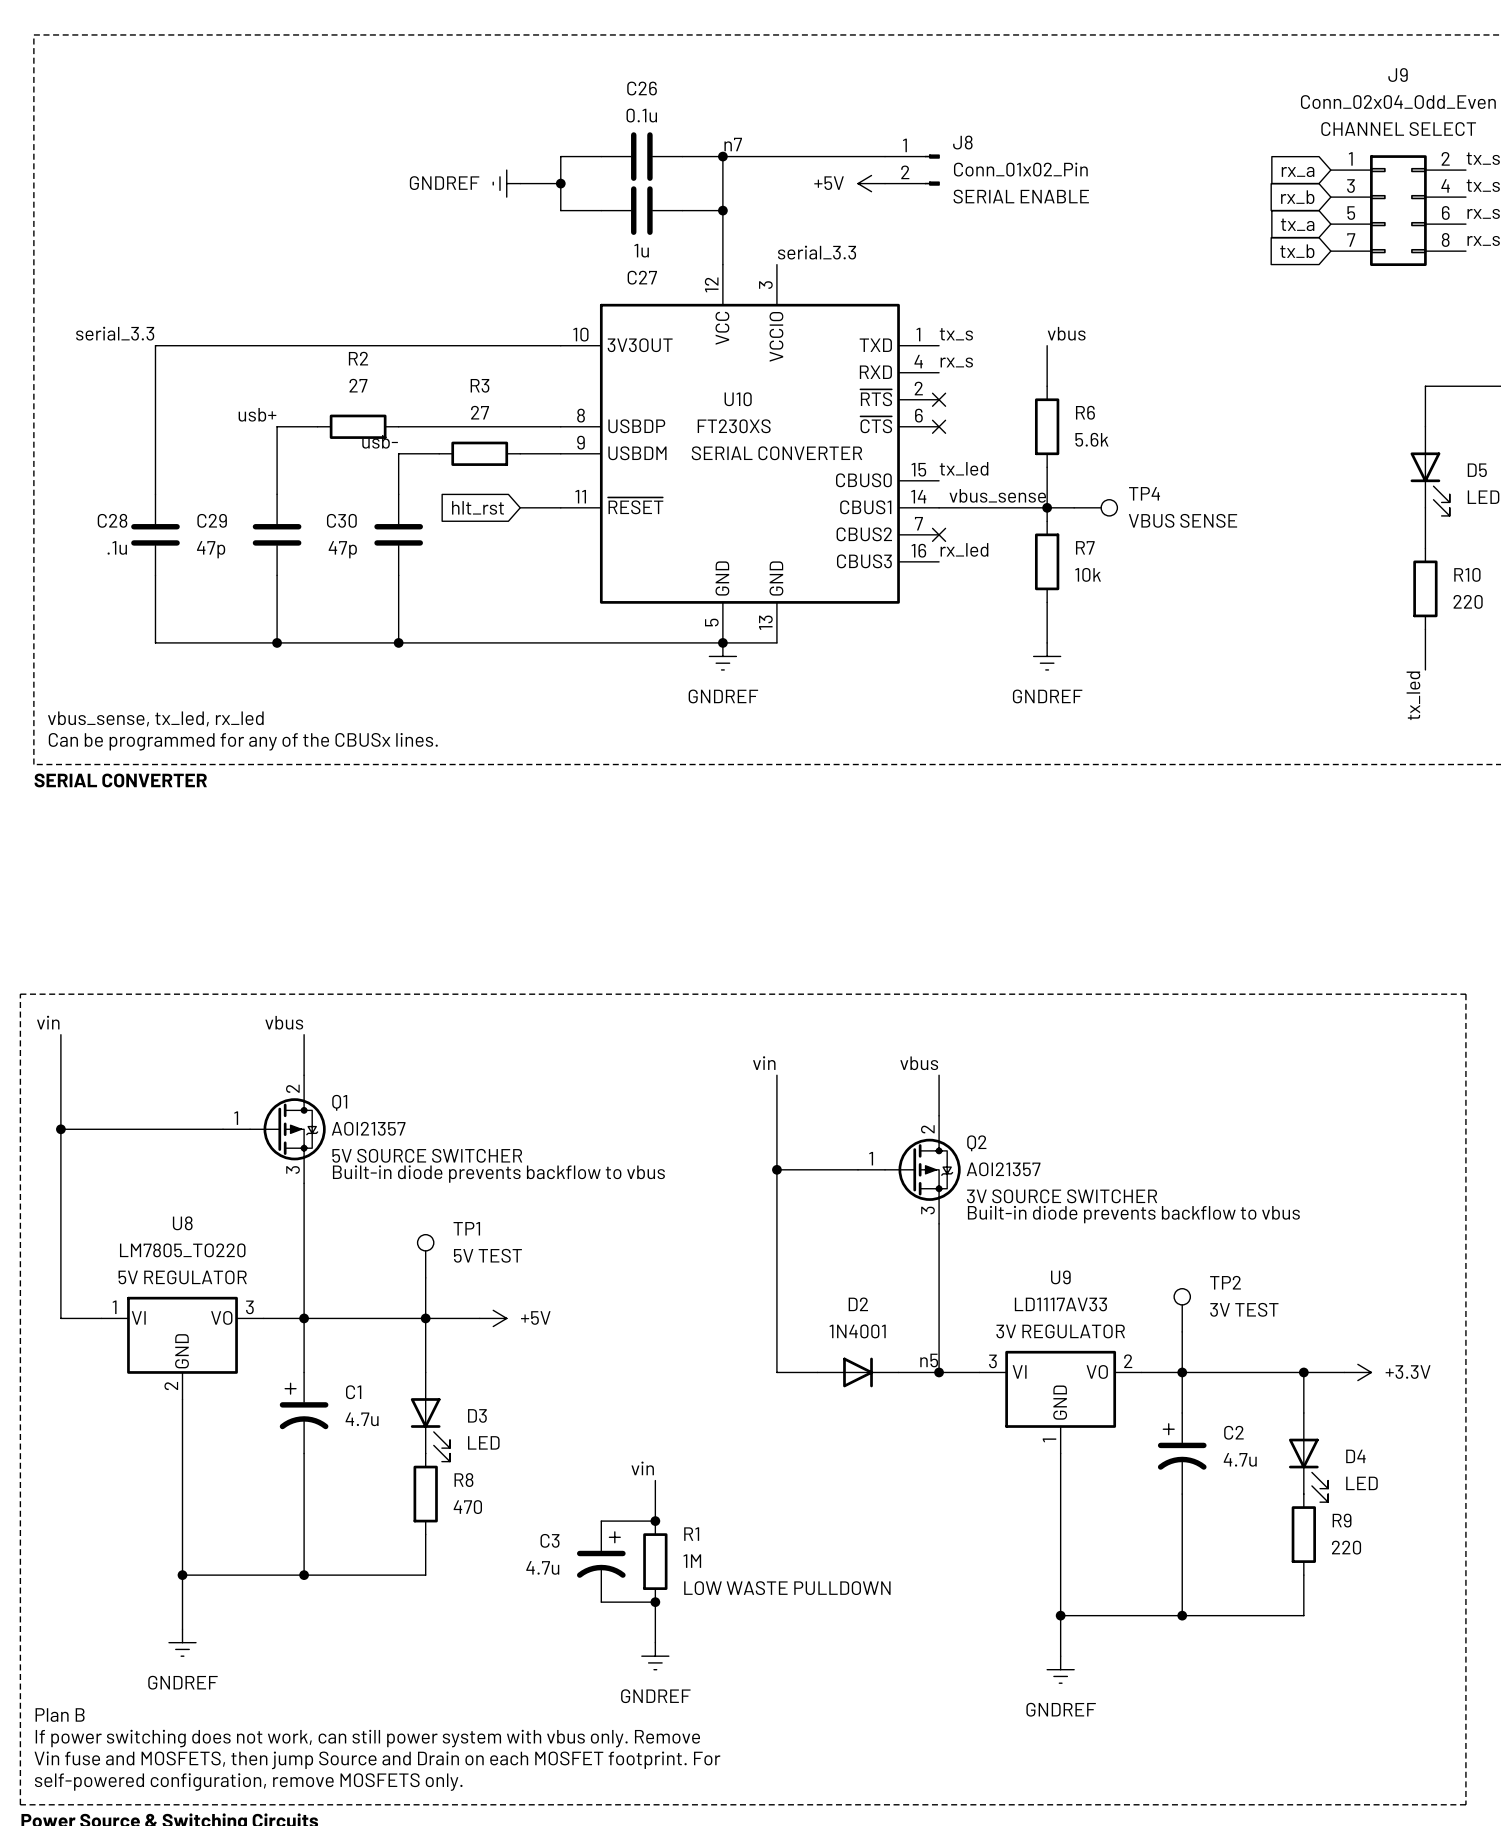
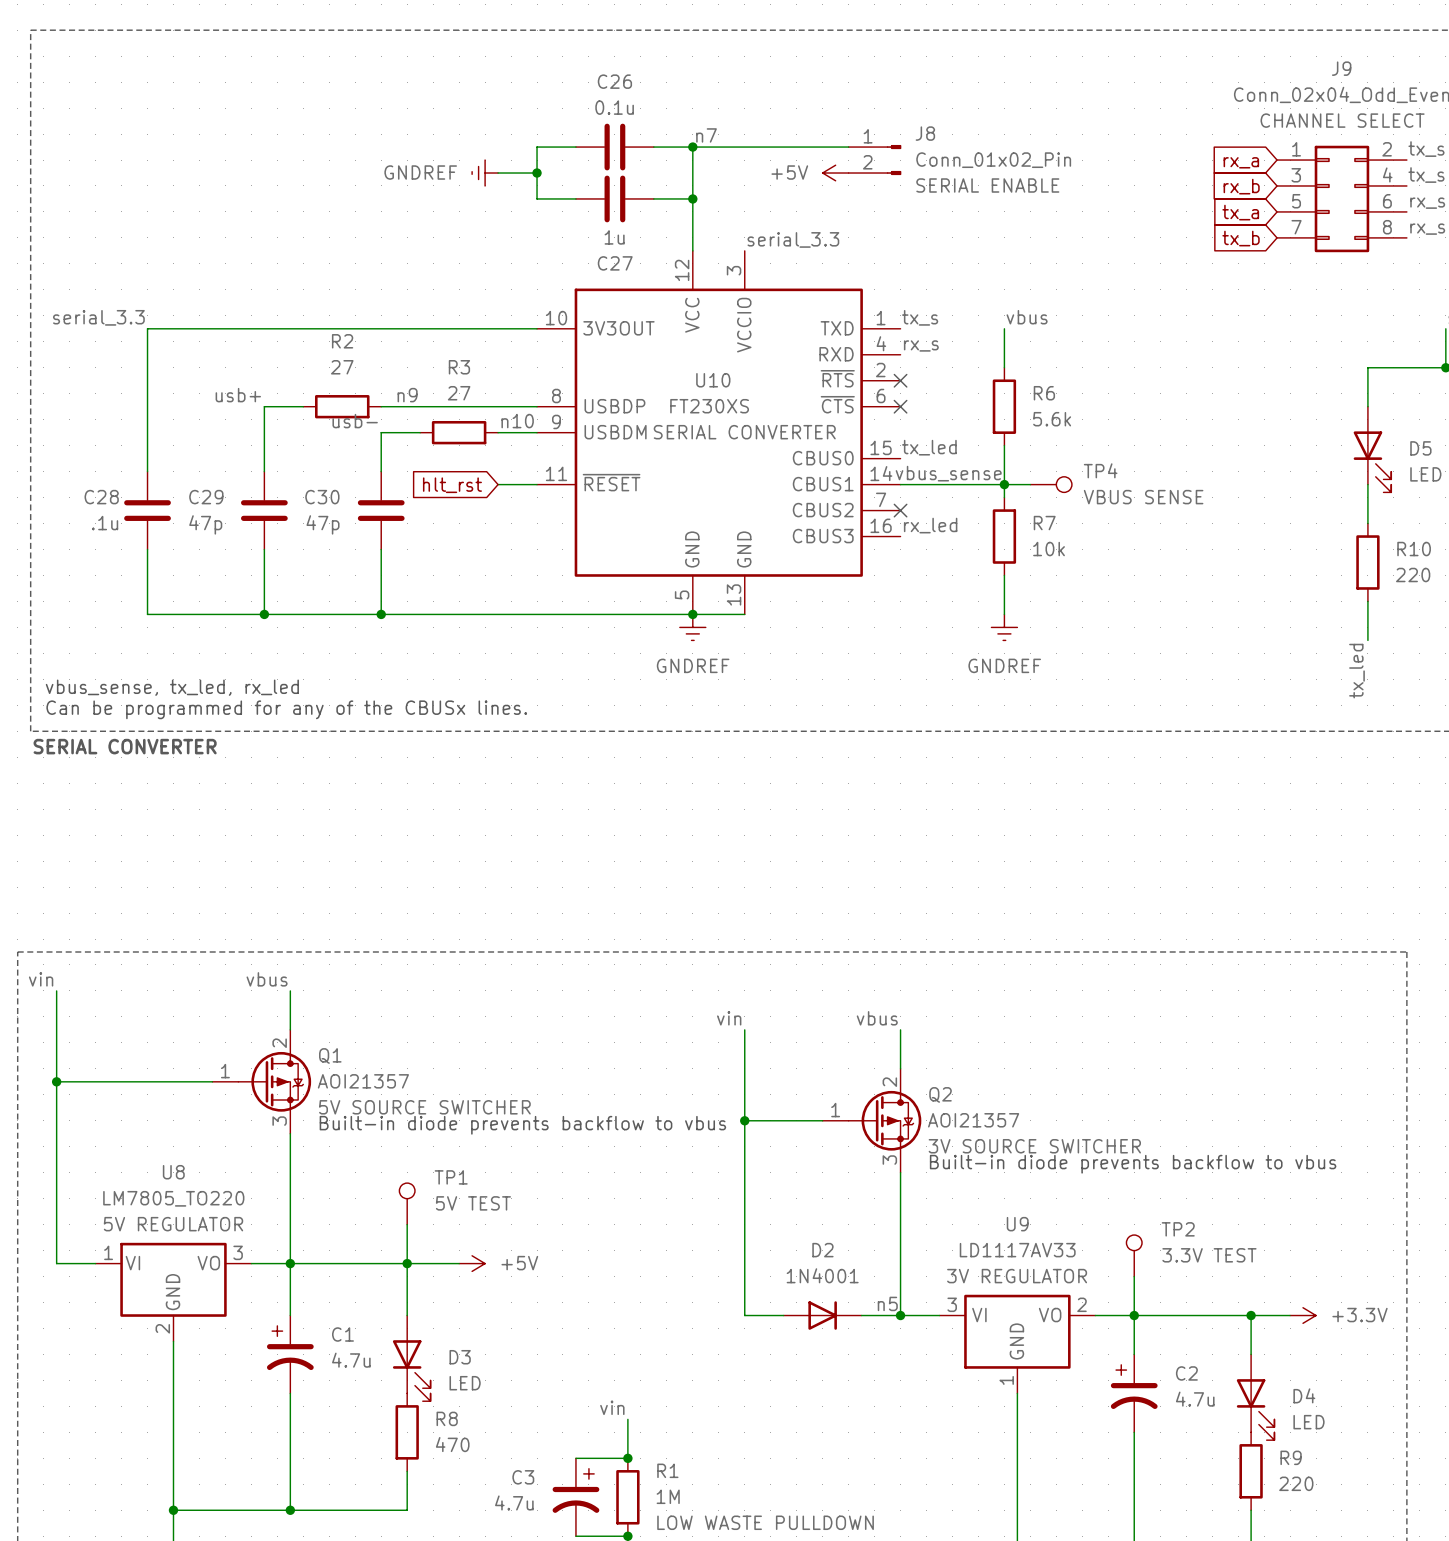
label: none -> n9 (407, 395)
label: none -> n10 (517, 421)
TP2 value: 3V TEST (1244, 1309) -> 3.3V TEST (1209, 1255)

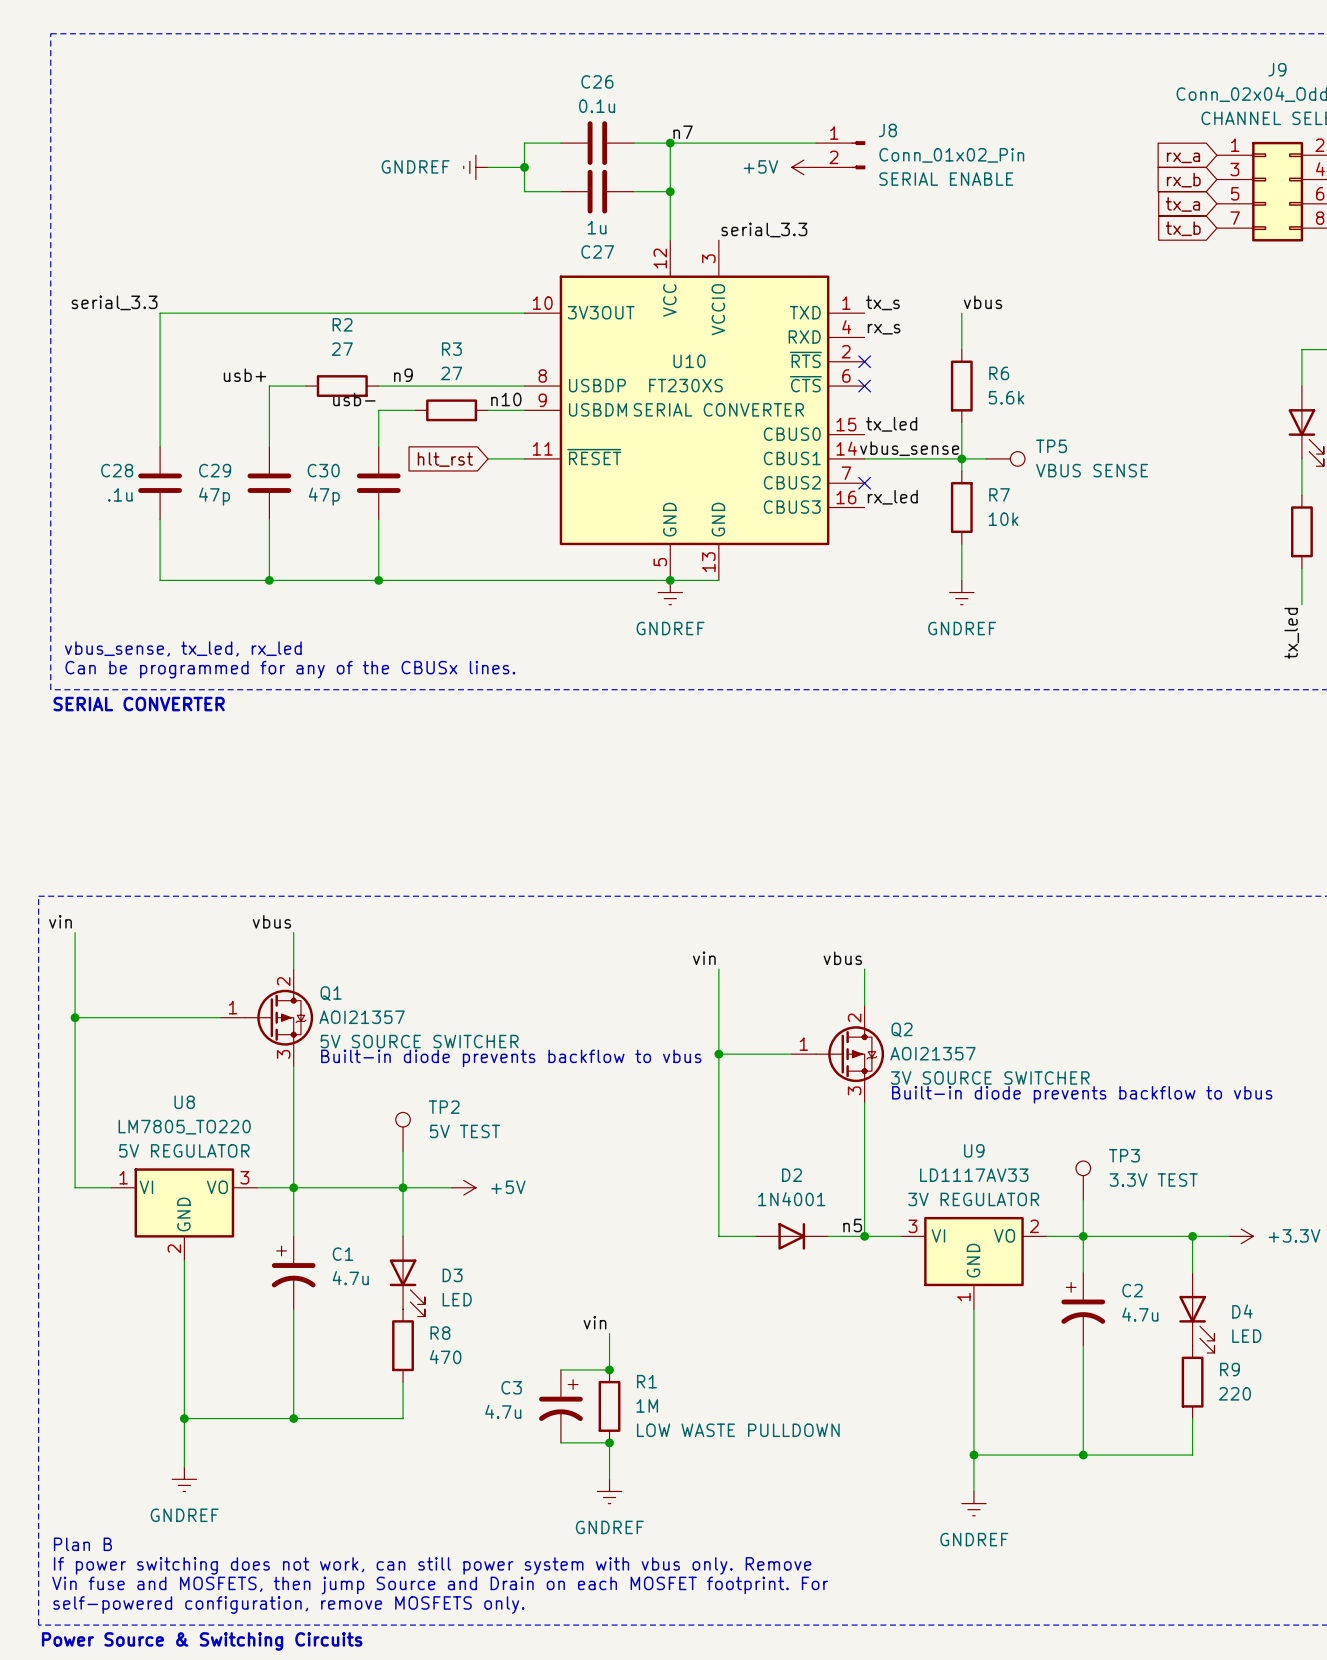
TP4 name: TP4 (1100, 470) -> TP5 (1051, 446)
TP1 name: TP1 (451, 1177) -> TP2 (444, 1107)
TP2 name: TP2 (1178, 1229) -> TP3 (1124, 1155)

